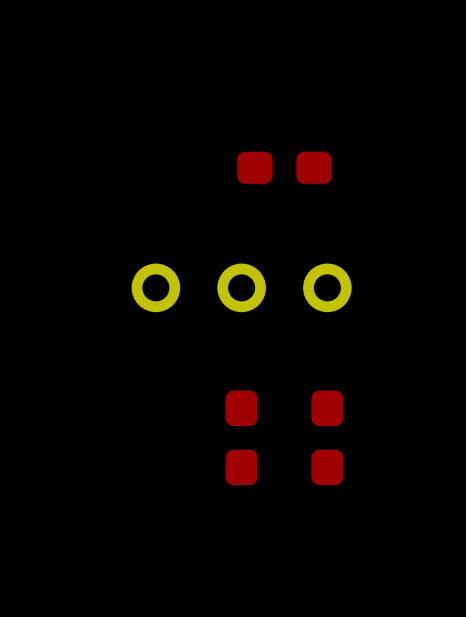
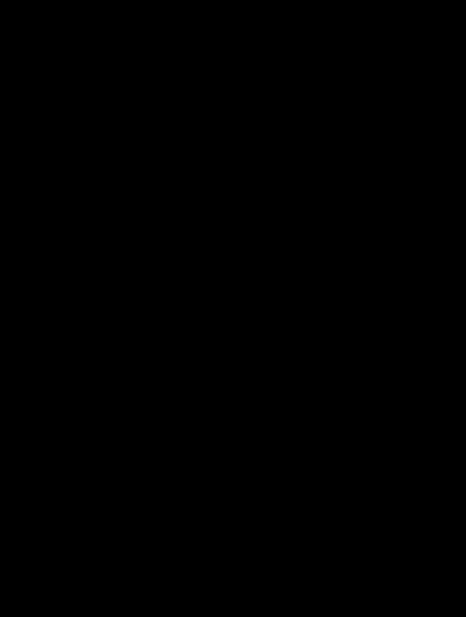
part: (284, 167) -> none
part: (241, 287) -> none
part: (241, 437) -> none
part: (327, 437) -> none

